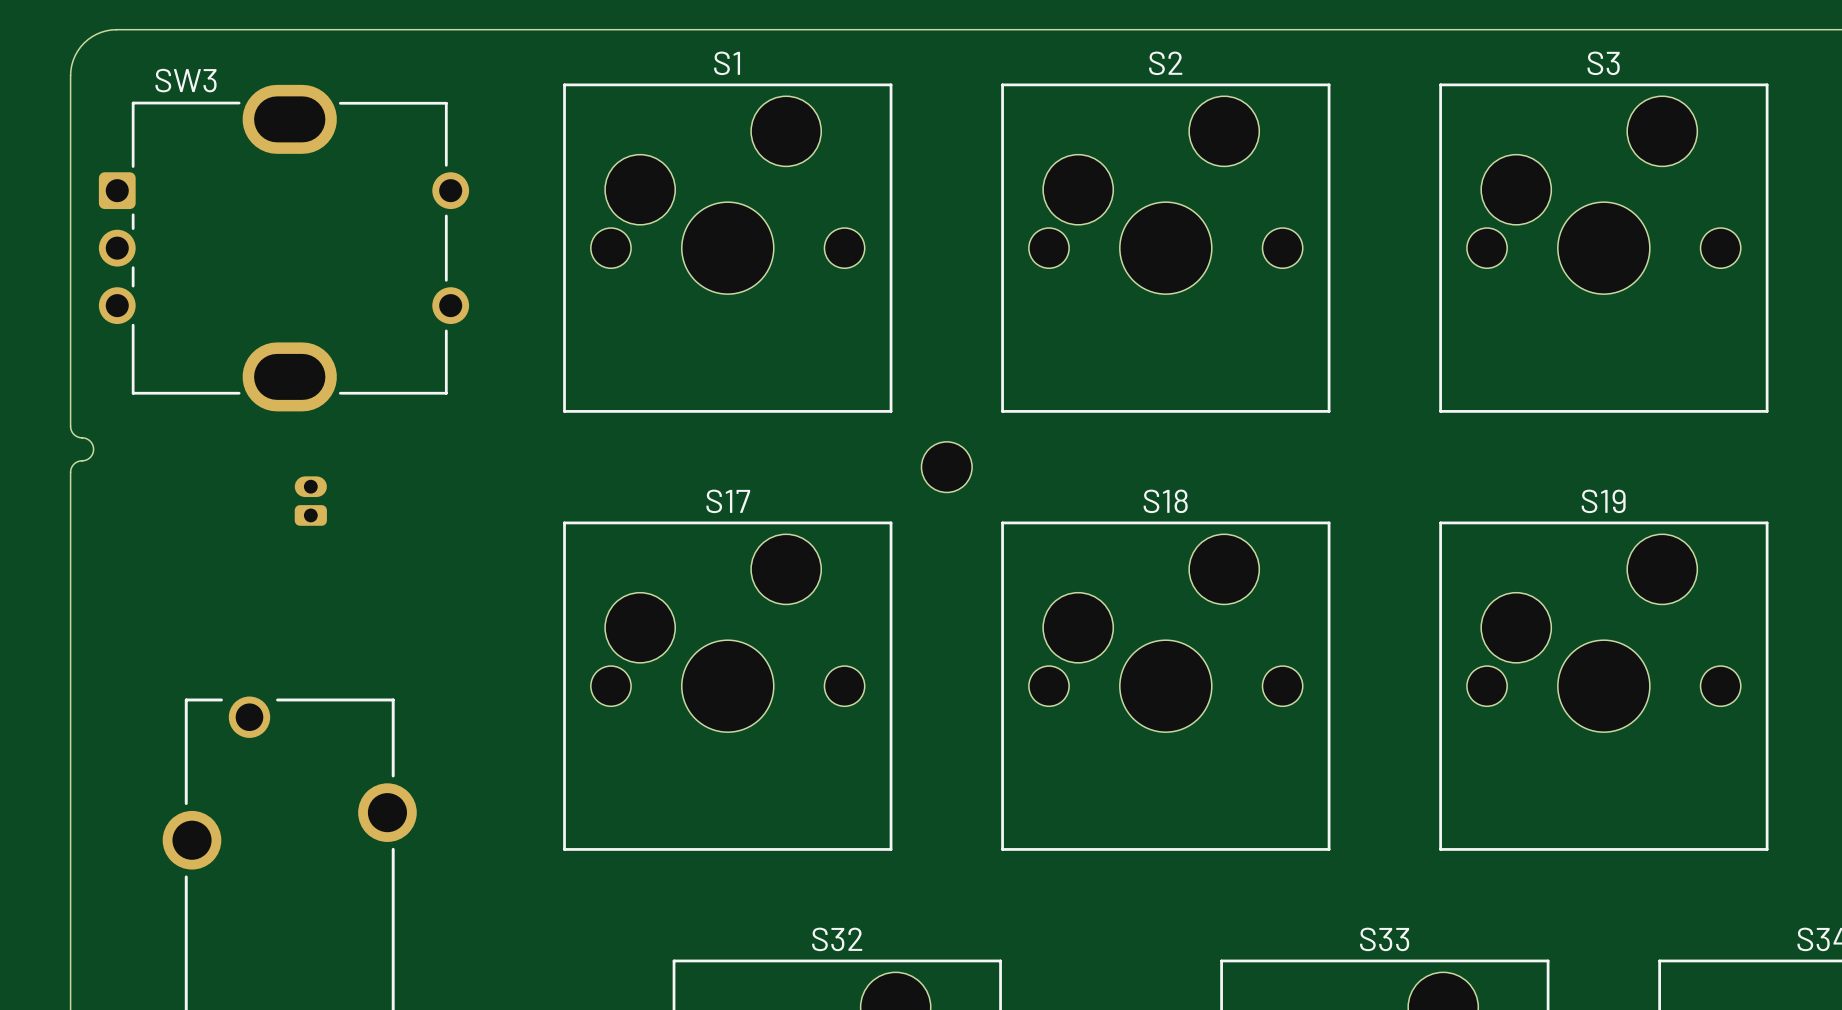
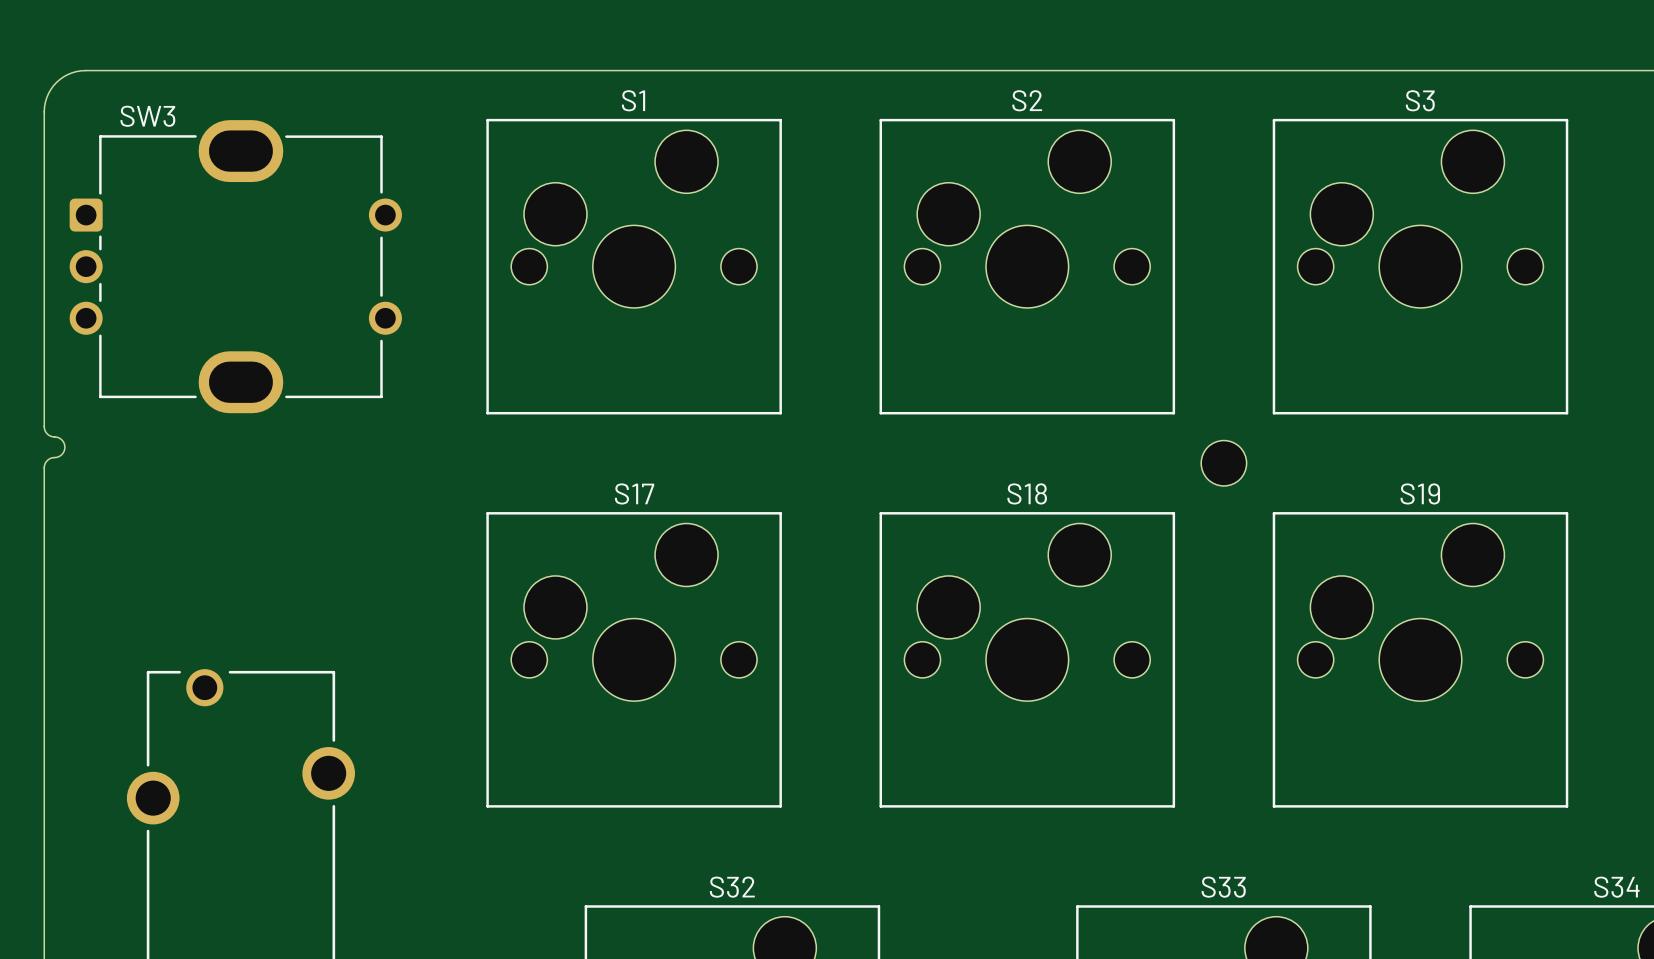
part position: (946, 467) -> (1223, 463)
part: (310, 501) -> none

